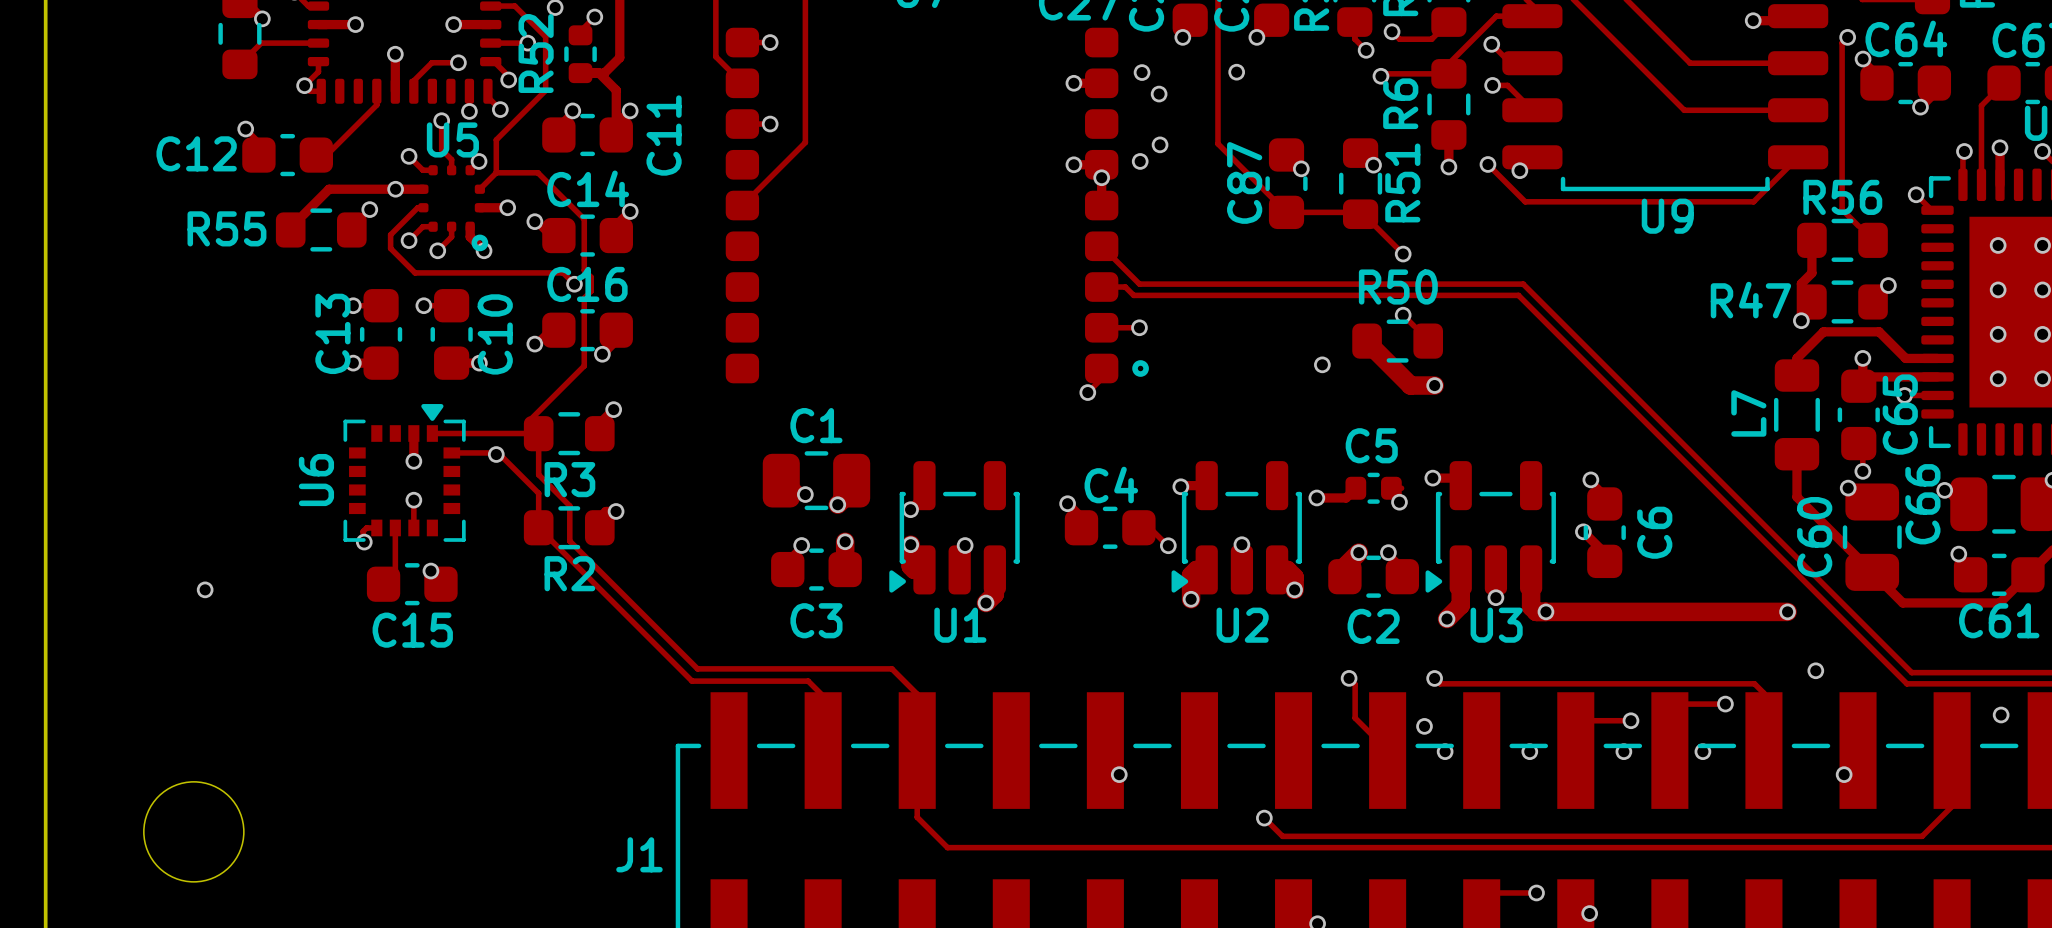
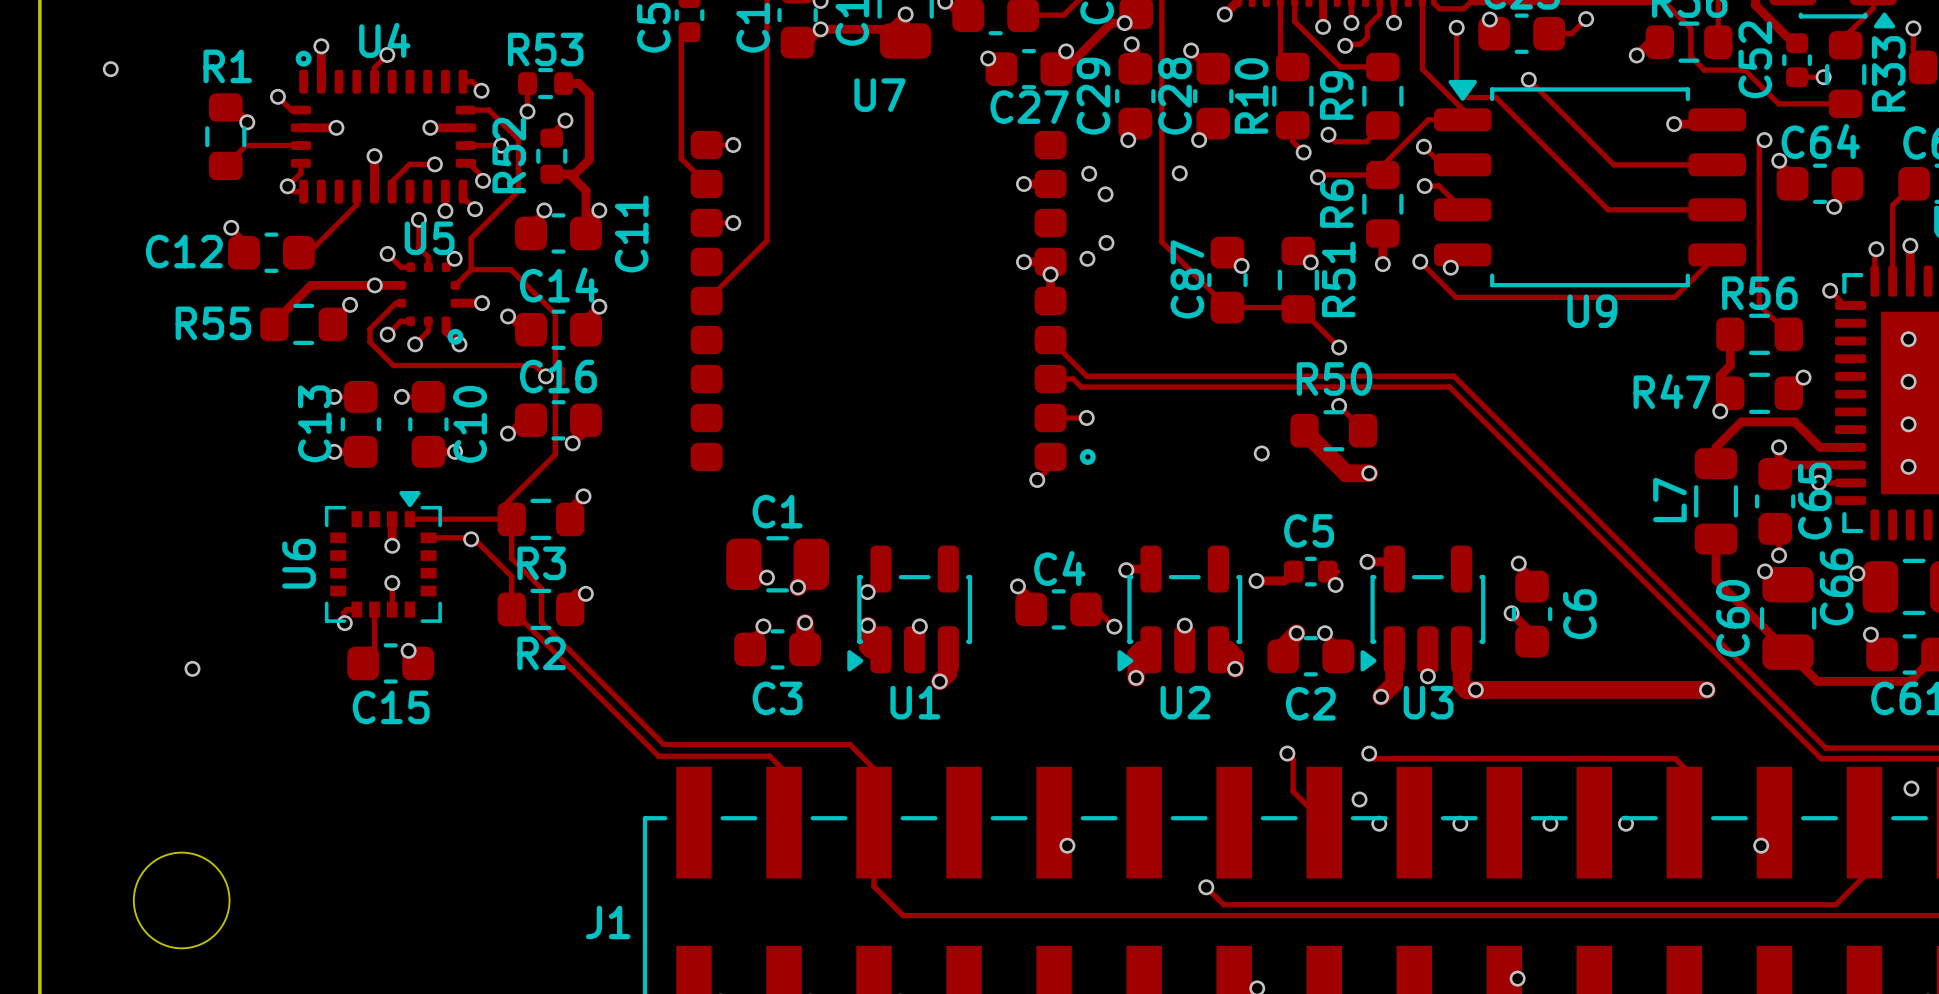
via: (1815, 670) -> none
track: (1686, 704) (1725, 704) -> none
via: (1725, 704) -> none
track: (1592, 720) (1630, 720) -> none
via: (1630, 720) -> none
track: (1497, 892) (1536, 892) -> none
via: (1536, 892) -> none

